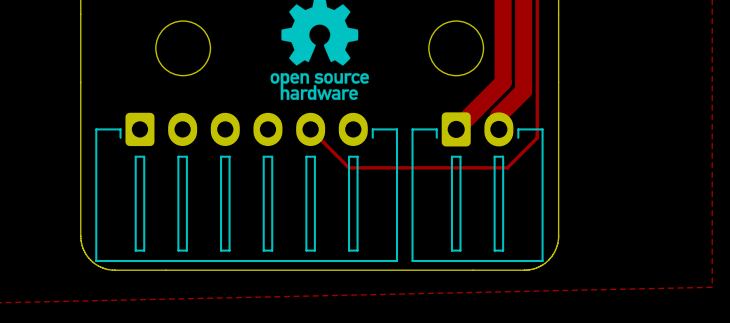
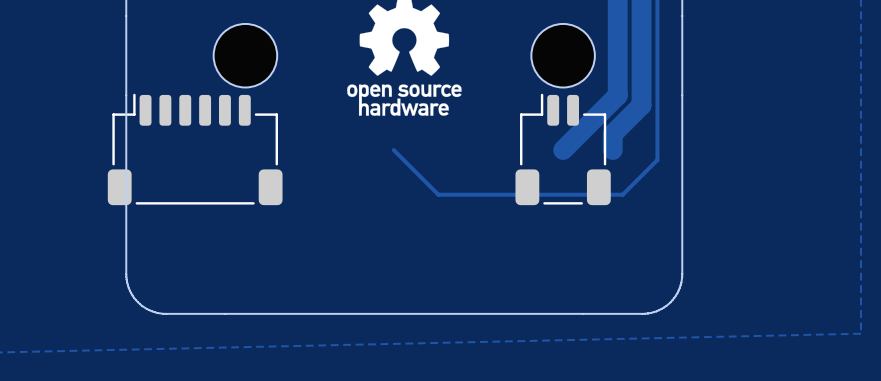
part: none -> (195, 149)
part: none -> (563, 149)
part: (246, 187) -> none
part: (477, 187) -> none

